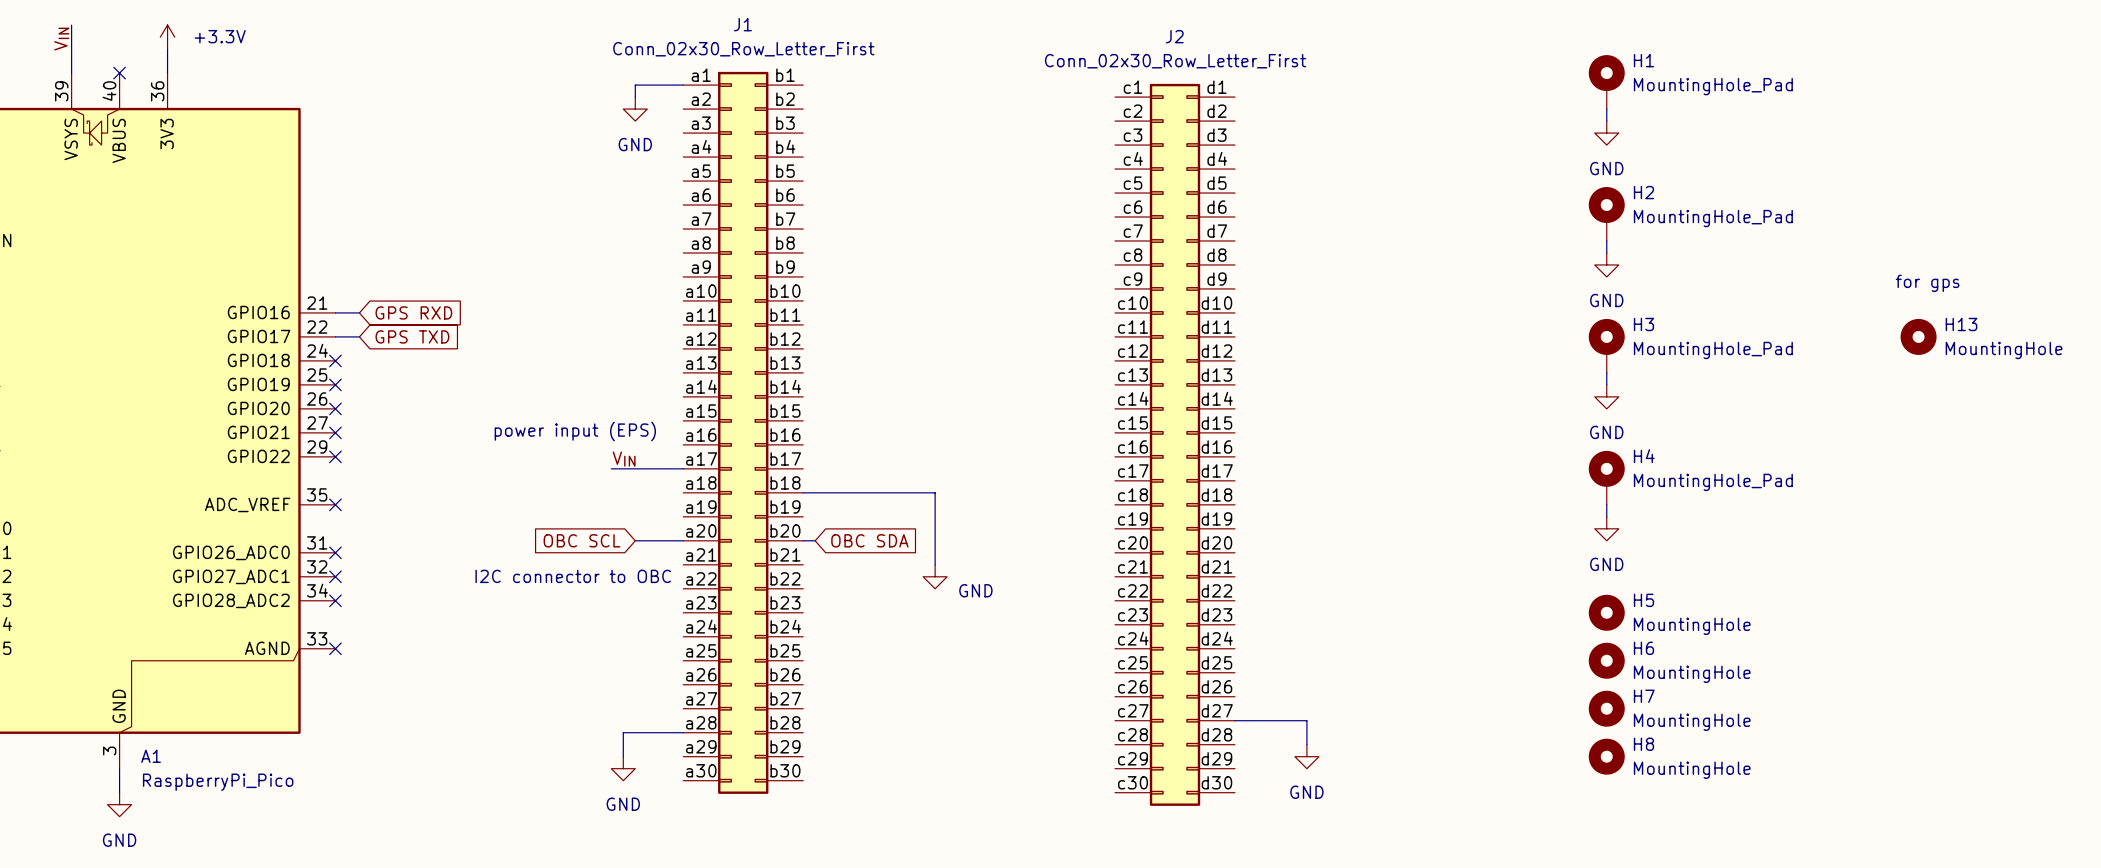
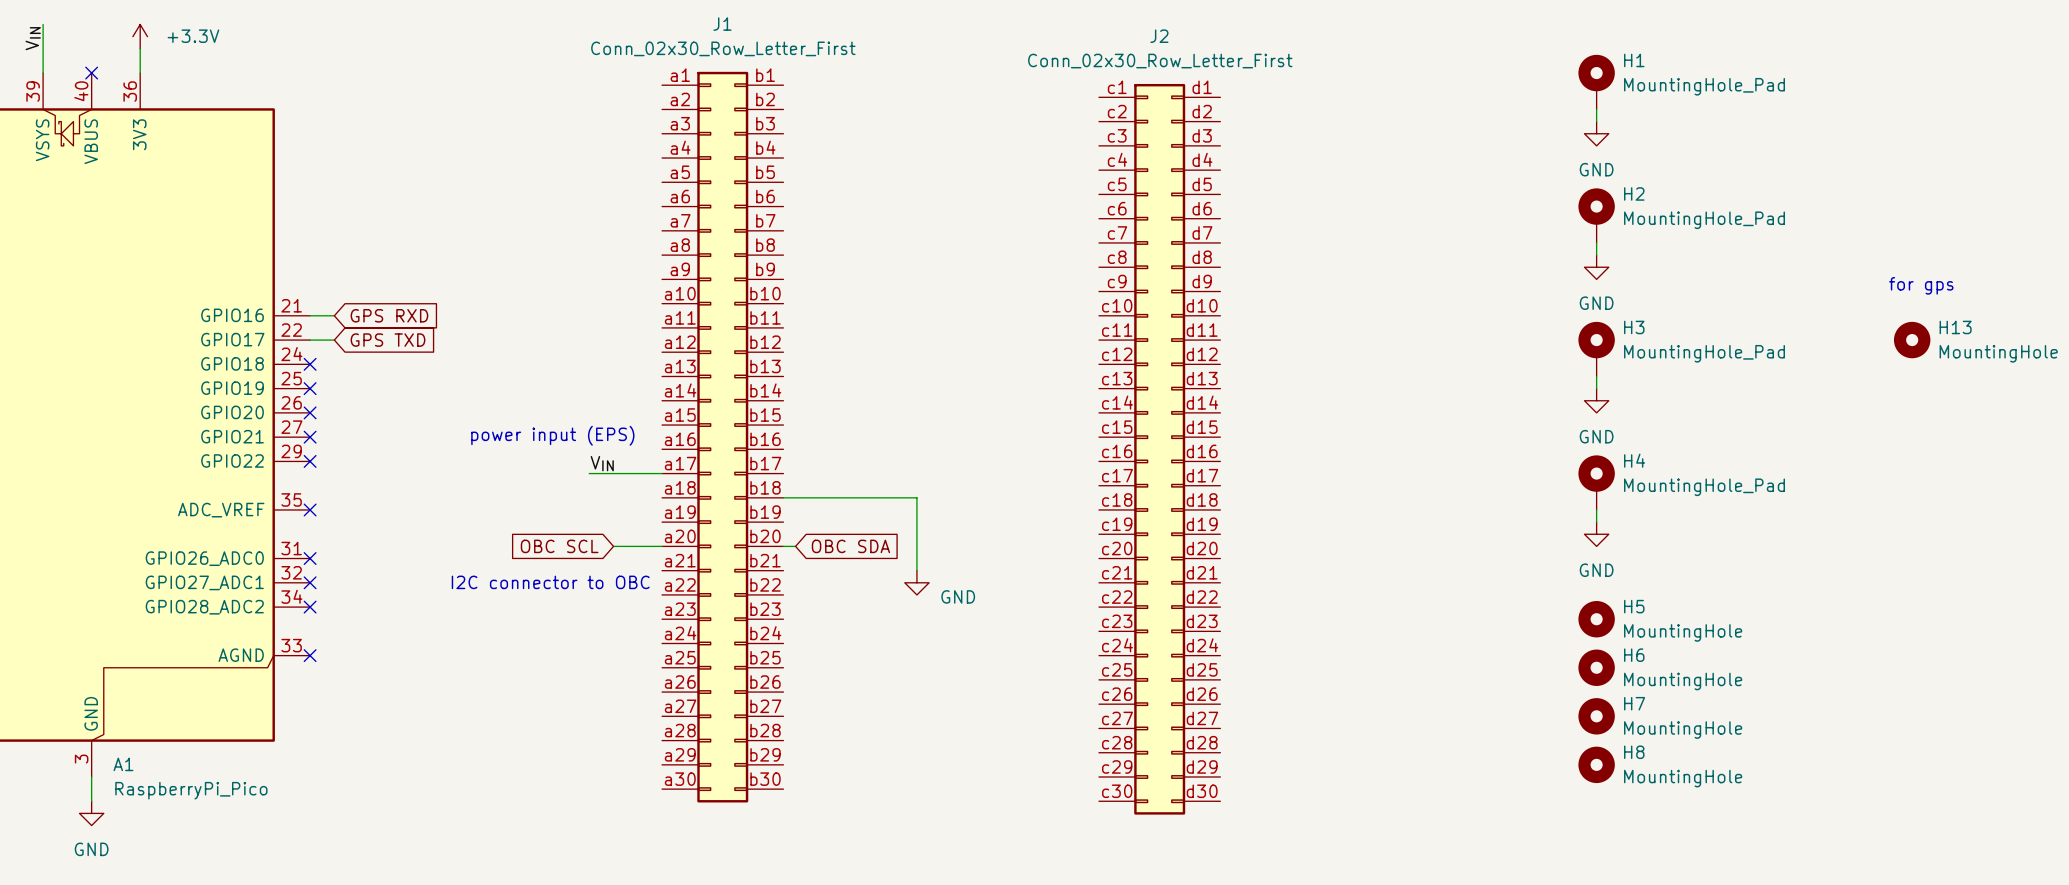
wire: (683, 85) (635, 85) (635, 97) -> none
power symbol: GND (635, 109) -> none
wire: (1234, 720) (1306, 720) (1306, 744) -> none
wire: (683, 732) (623, 732) (623, 756) -> none
power symbol: GND (1306, 756) -> none
power symbol: GND (623, 768) -> none

